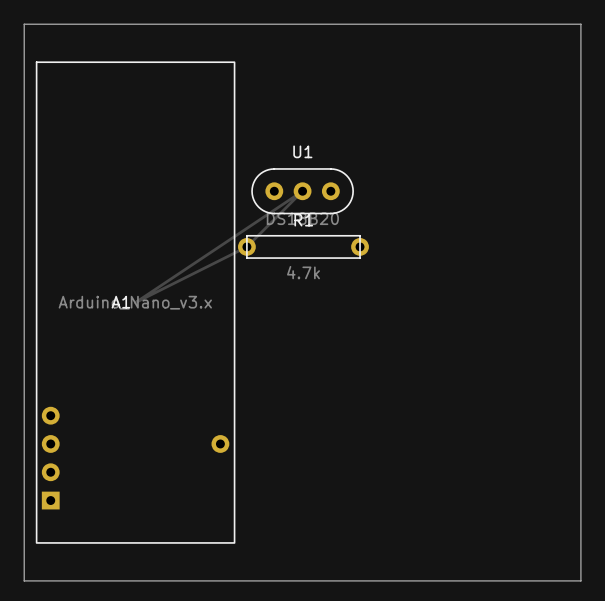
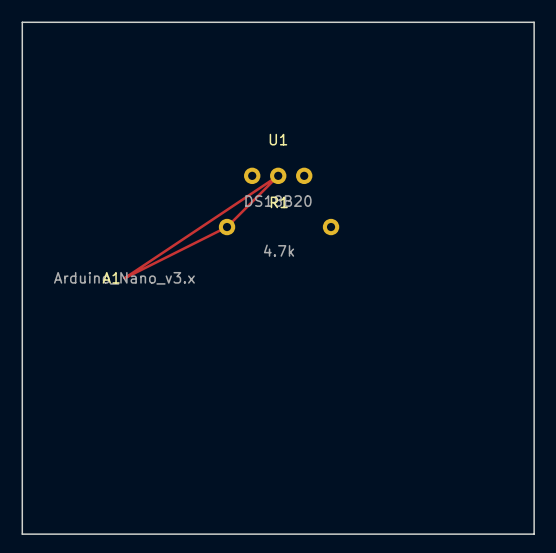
A1 footprint: [35, 61, 236, 544] -> [53, 271, 195, 285]
U1 footprint: [251, 168, 354, 215] -> [244, 167, 313, 185]
R1 footprint: [238, 234, 369, 259] -> [218, 218, 340, 236]

